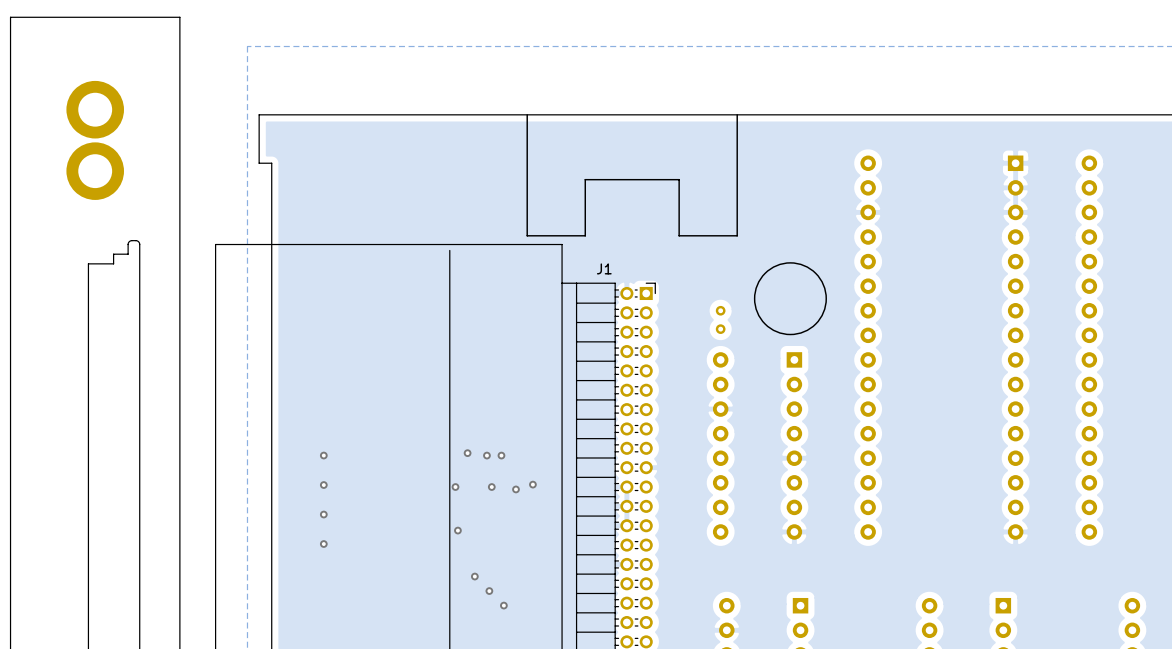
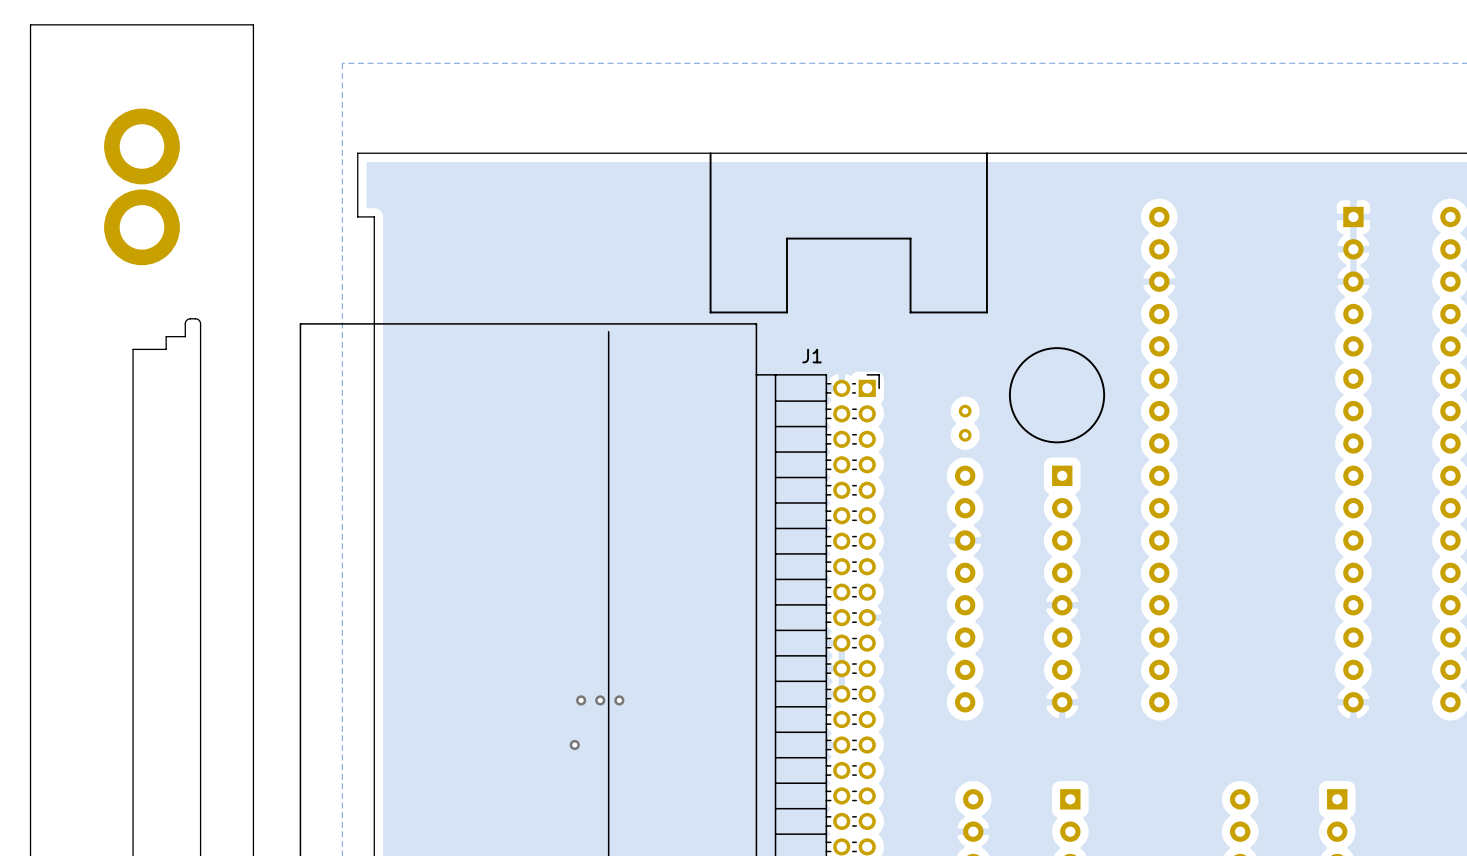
via: (467, 453) -> none
via: (323, 455) -> none
via: (486, 455) -> none
via: (501, 455) -> none
via: (532, 484) -> none
via: (323, 485) -> none
via: (455, 487) -> none
via: (491, 487) -> none
via: (515, 489) -> none
via: (323, 514) -> none
via: none -> (581, 700)
via: none -> (600, 700)
via: (323, 544) -> none
via: none -> (574, 745)
via: (474, 576) -> none
via: (489, 591) -> none
via: (503, 605) -> none

